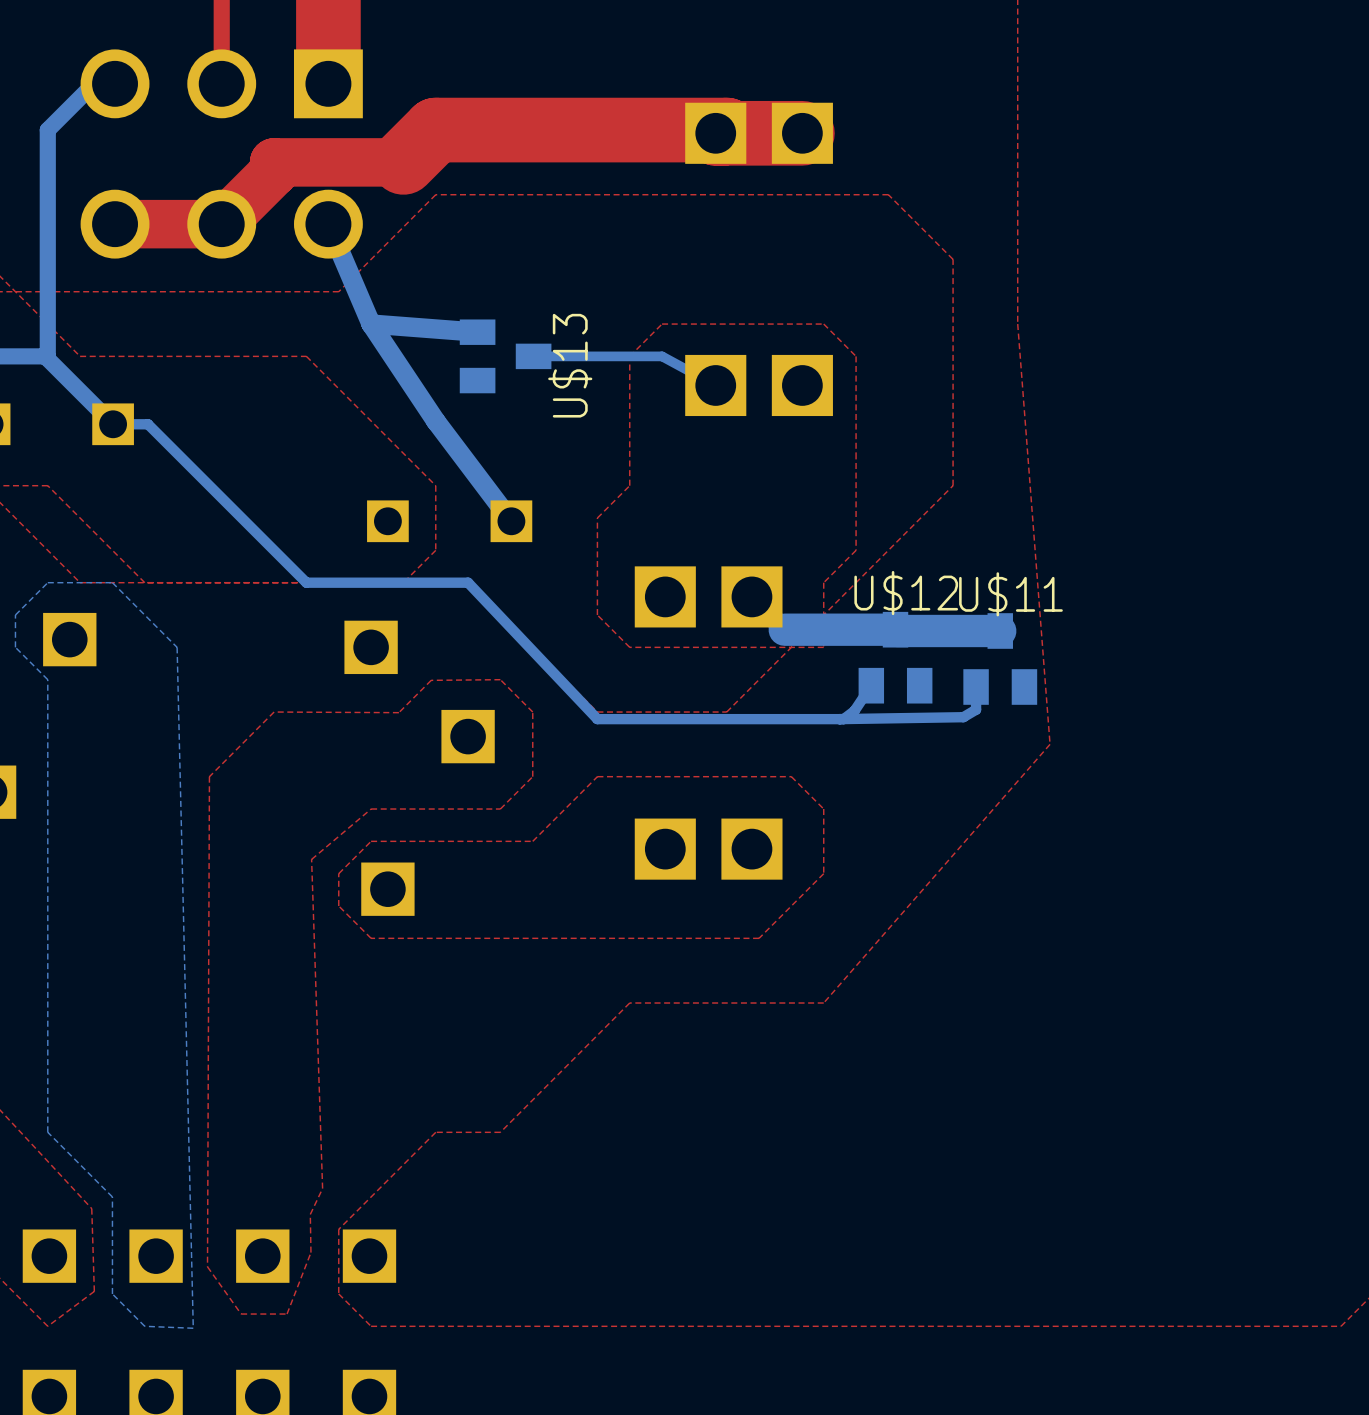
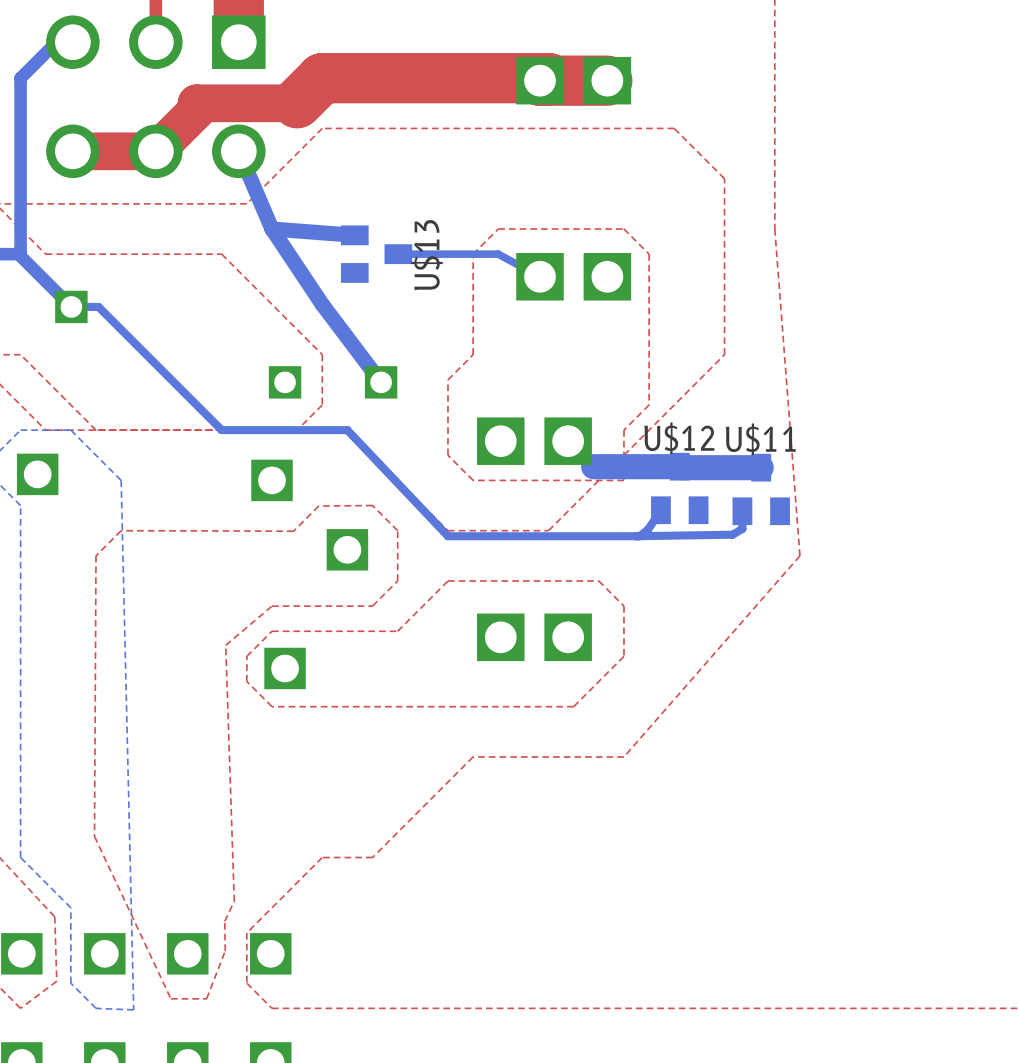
top zone outline: (398, 712) (274, 712) (209, 776) (207, 1266) (241, 1314) -> (293, 531) (121, 530) (96, 555) (94, 836) (170, 998)

